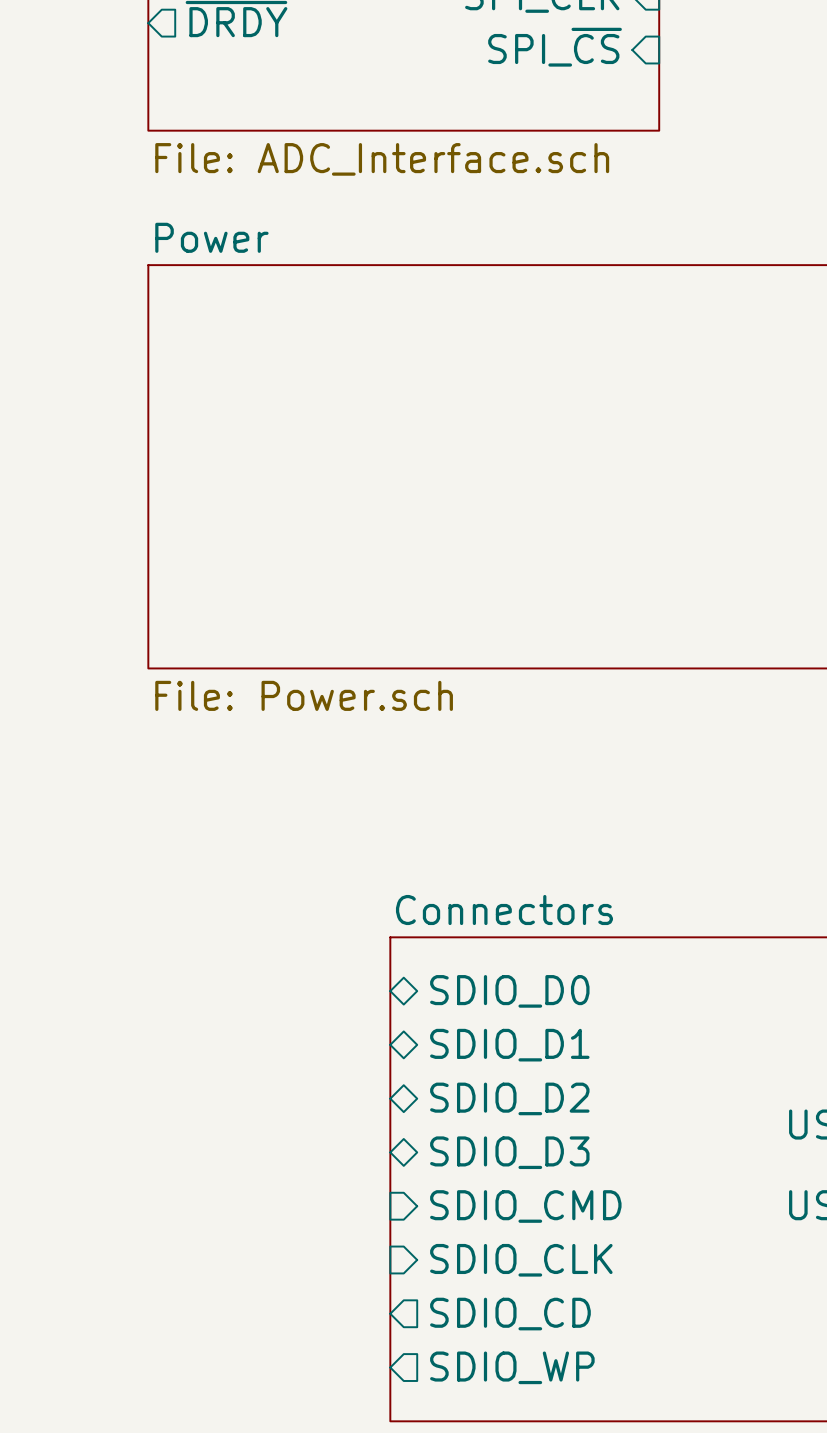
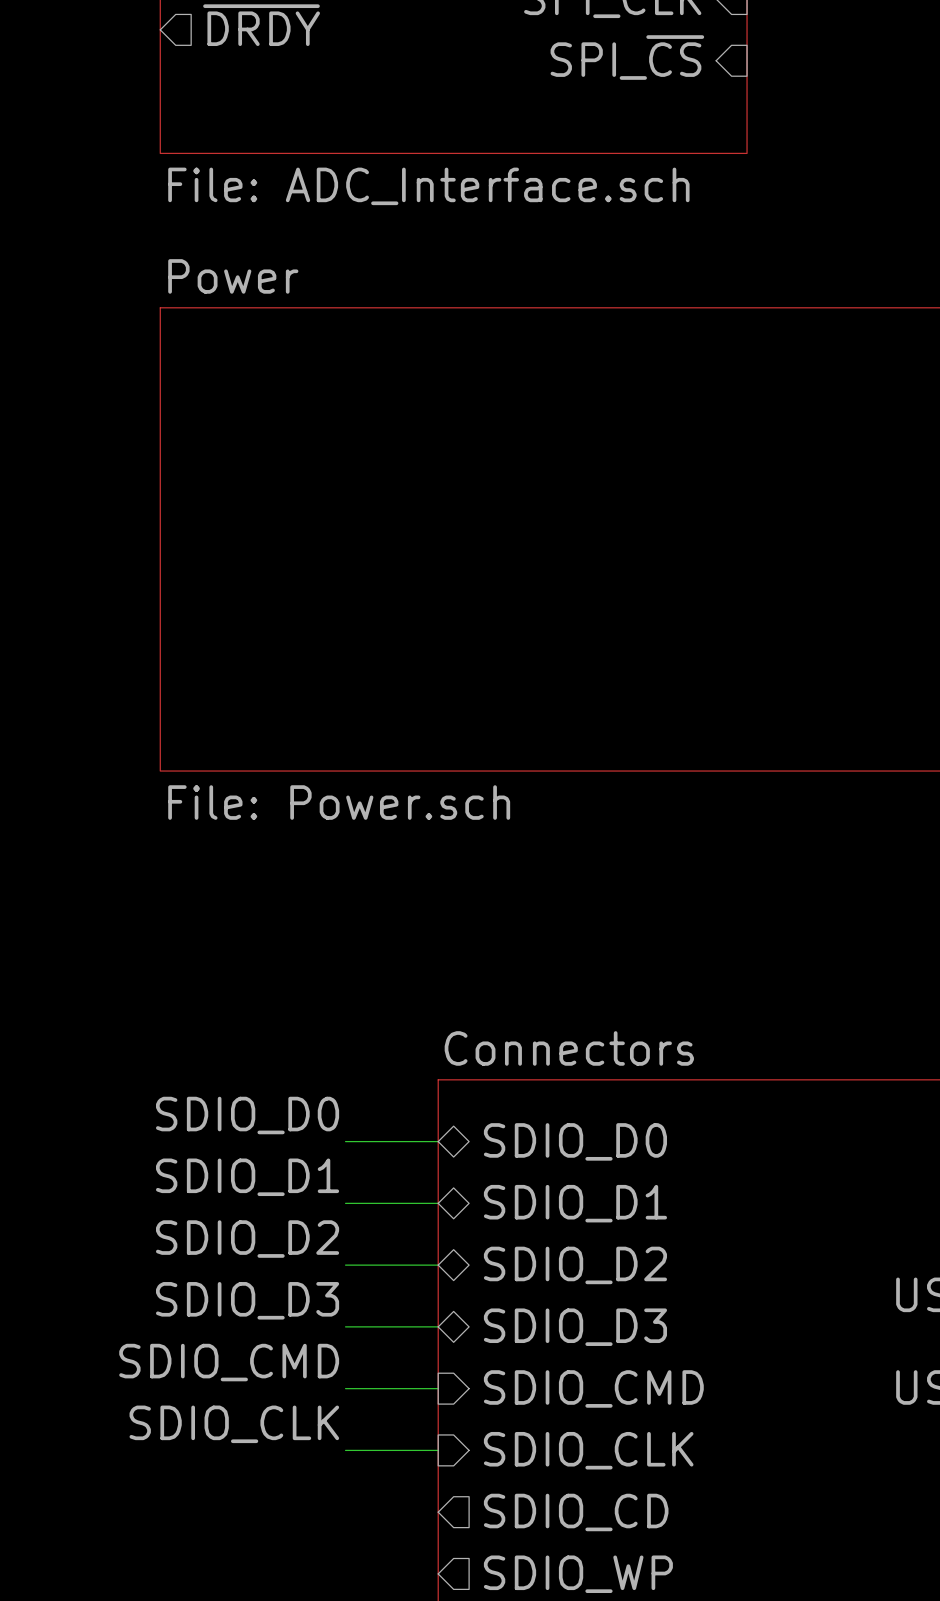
label: none -> SDIO_D0 (247, 1115)
wire: none -> (345, 1141) (438, 1141)
label: none -> SDIO_D1 (247, 1177)
wire: none -> (345, 1203) (438, 1203)
label: none -> SDIO_D2 (247, 1239)
wire: none -> (345, 1265) (438, 1265)
label: none -> SDIO_D3 (247, 1300)
wire: none -> (345, 1326) (438, 1326)
label: none -> SDIO_CMD (229, 1362)
wire: none -> (345, 1388) (438, 1388)
label: none -> SDIO_CLK (234, 1424)
wire: none -> (345, 1450) (438, 1450)

